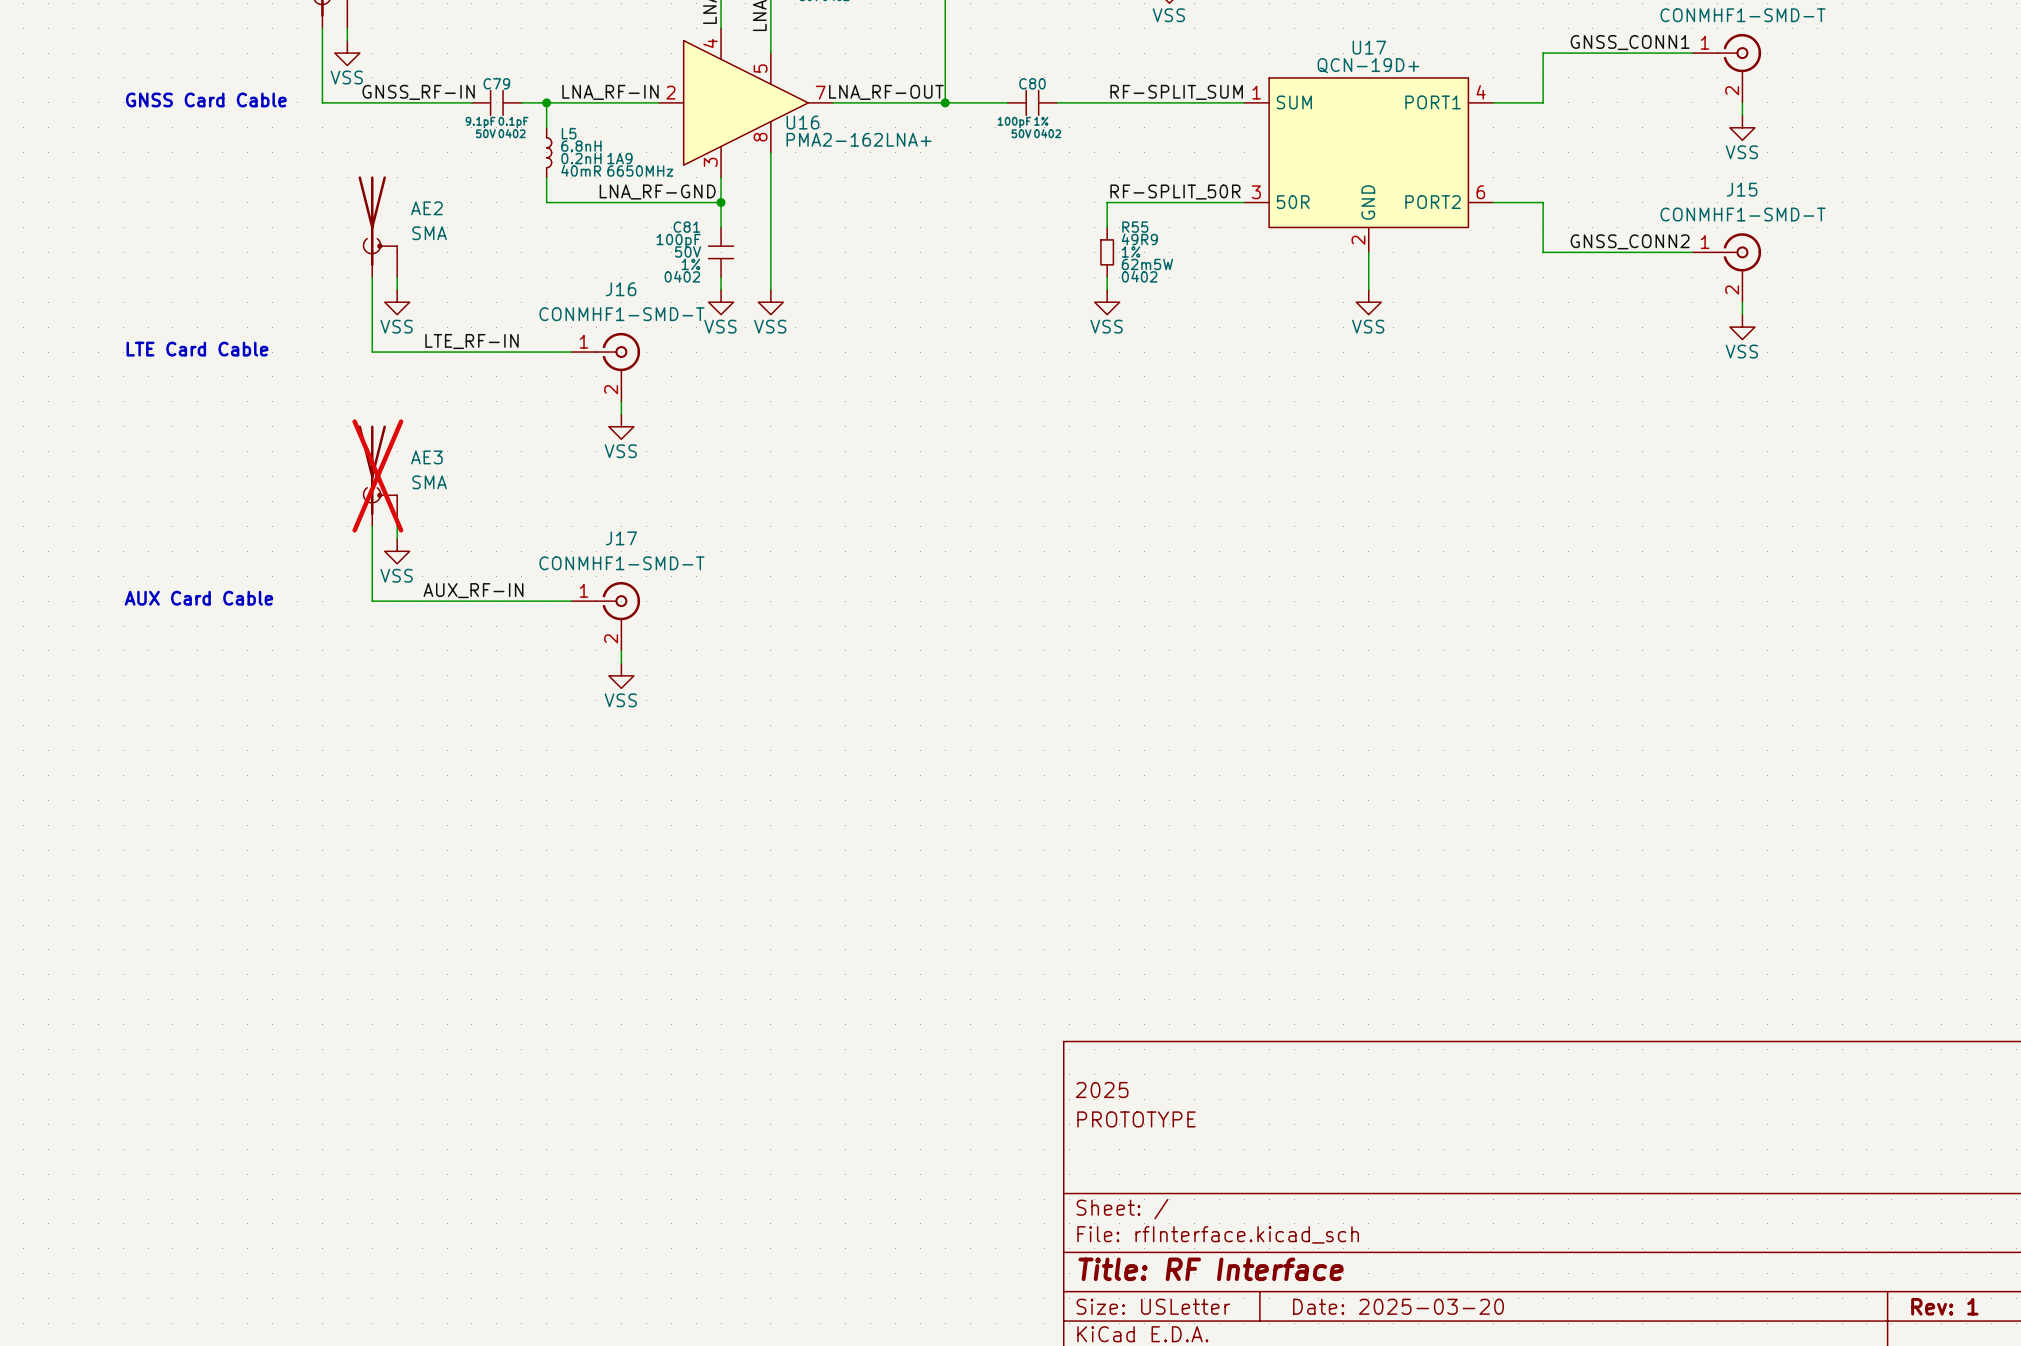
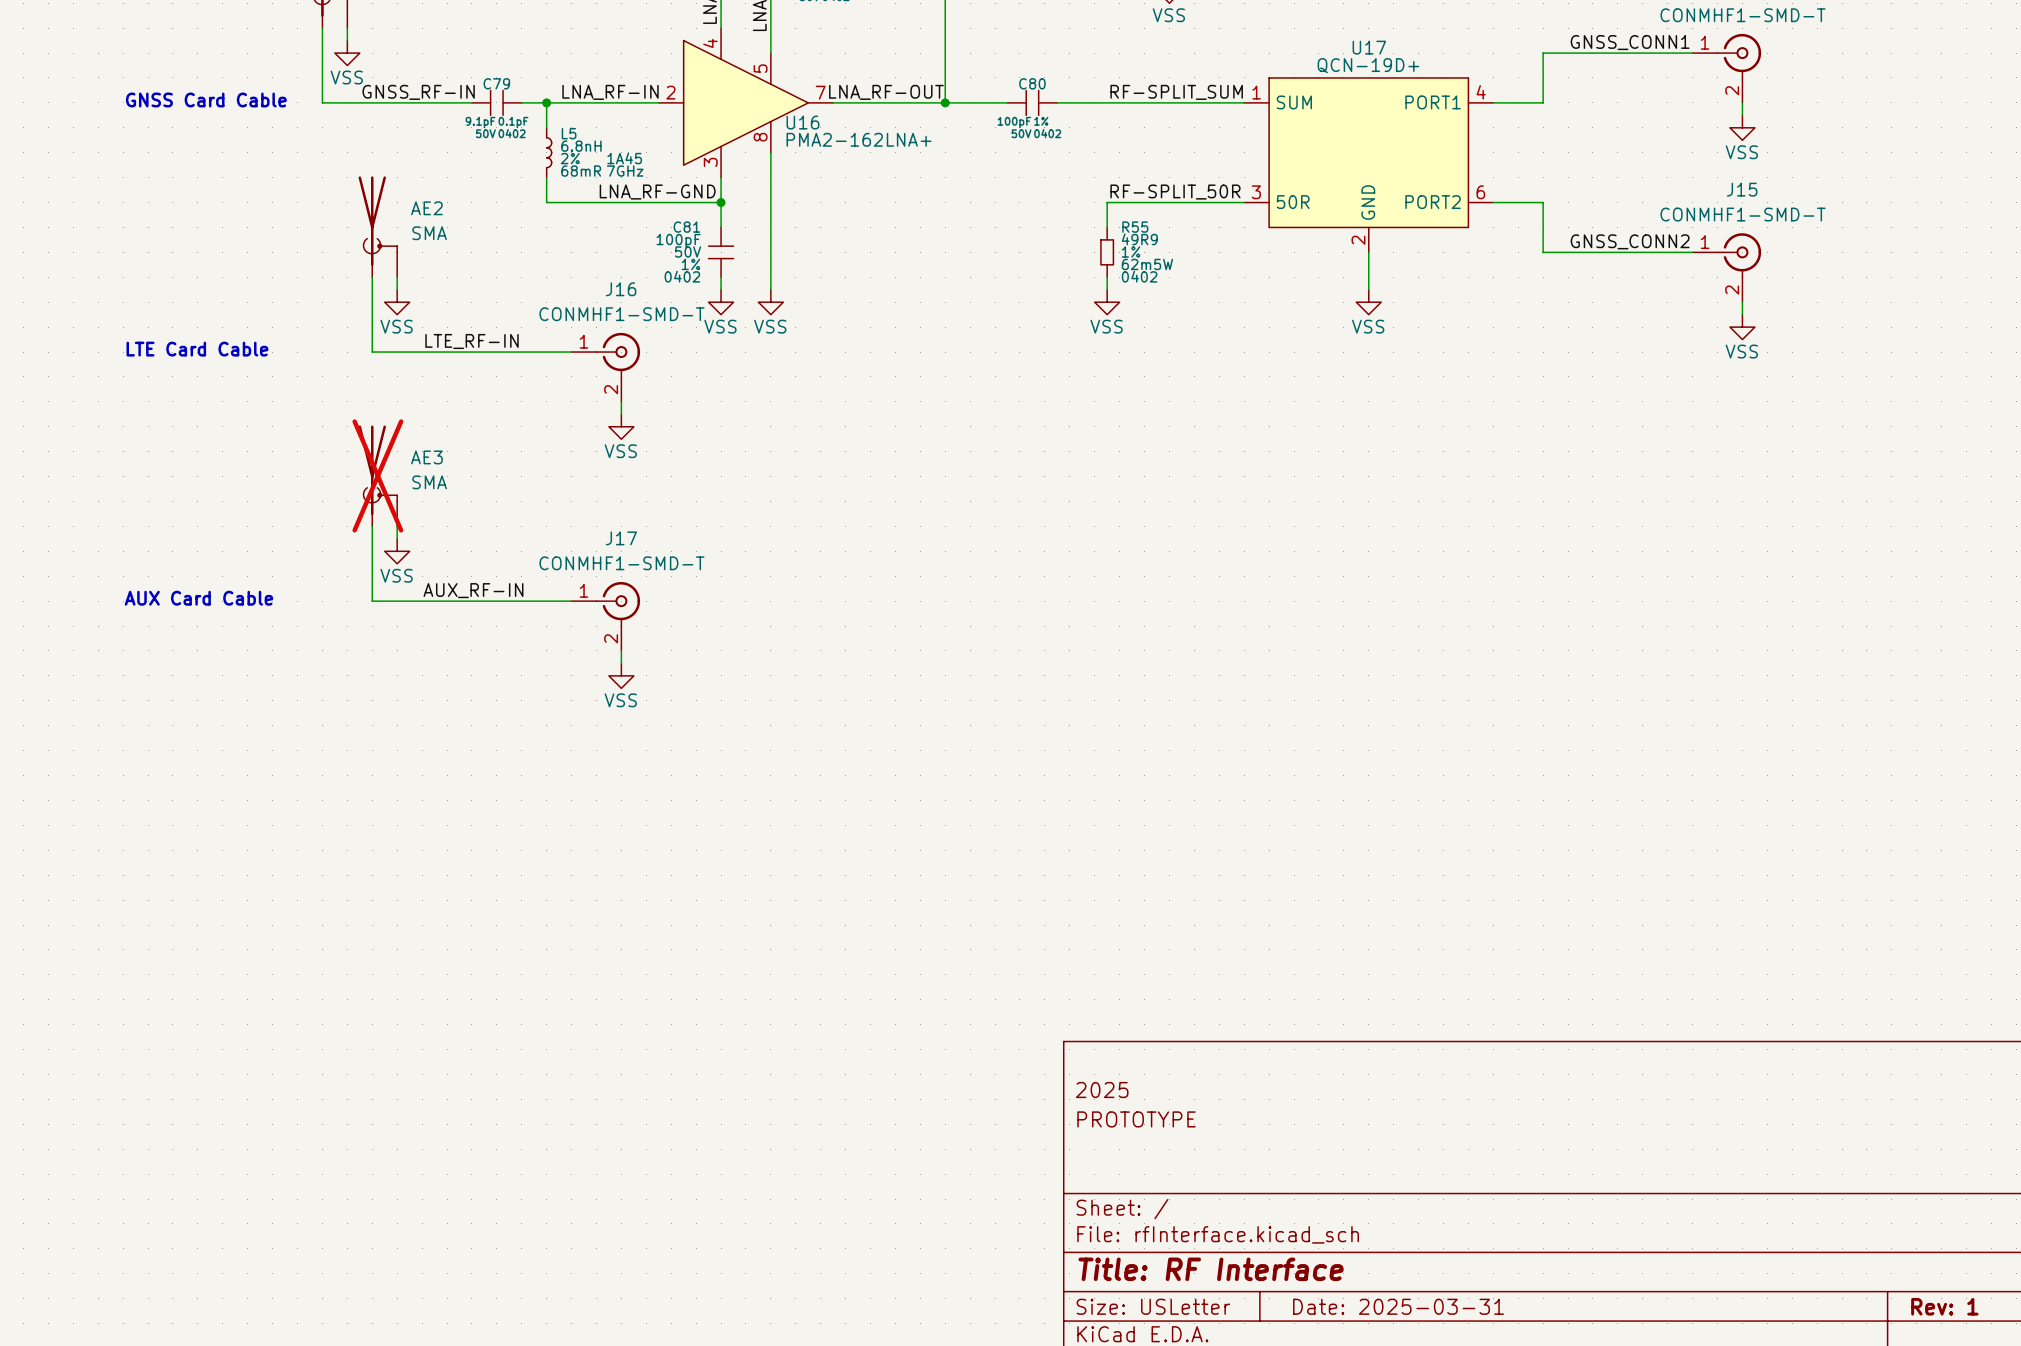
L5 text: 0.2nH (581, 158) -> 2% (570, 158)
L5 text: 1A9 (619, 158) -> 1A45 (624, 158)
L5 text: 40mR (581, 170) -> 68mR (581, 171)
L5 text: 6650MHz (640, 171) -> 7GHz (625, 171)
title block: Date: 2025-03-20 (1398, 1306) -> Date: 2025-03-31 (1398, 1306)

